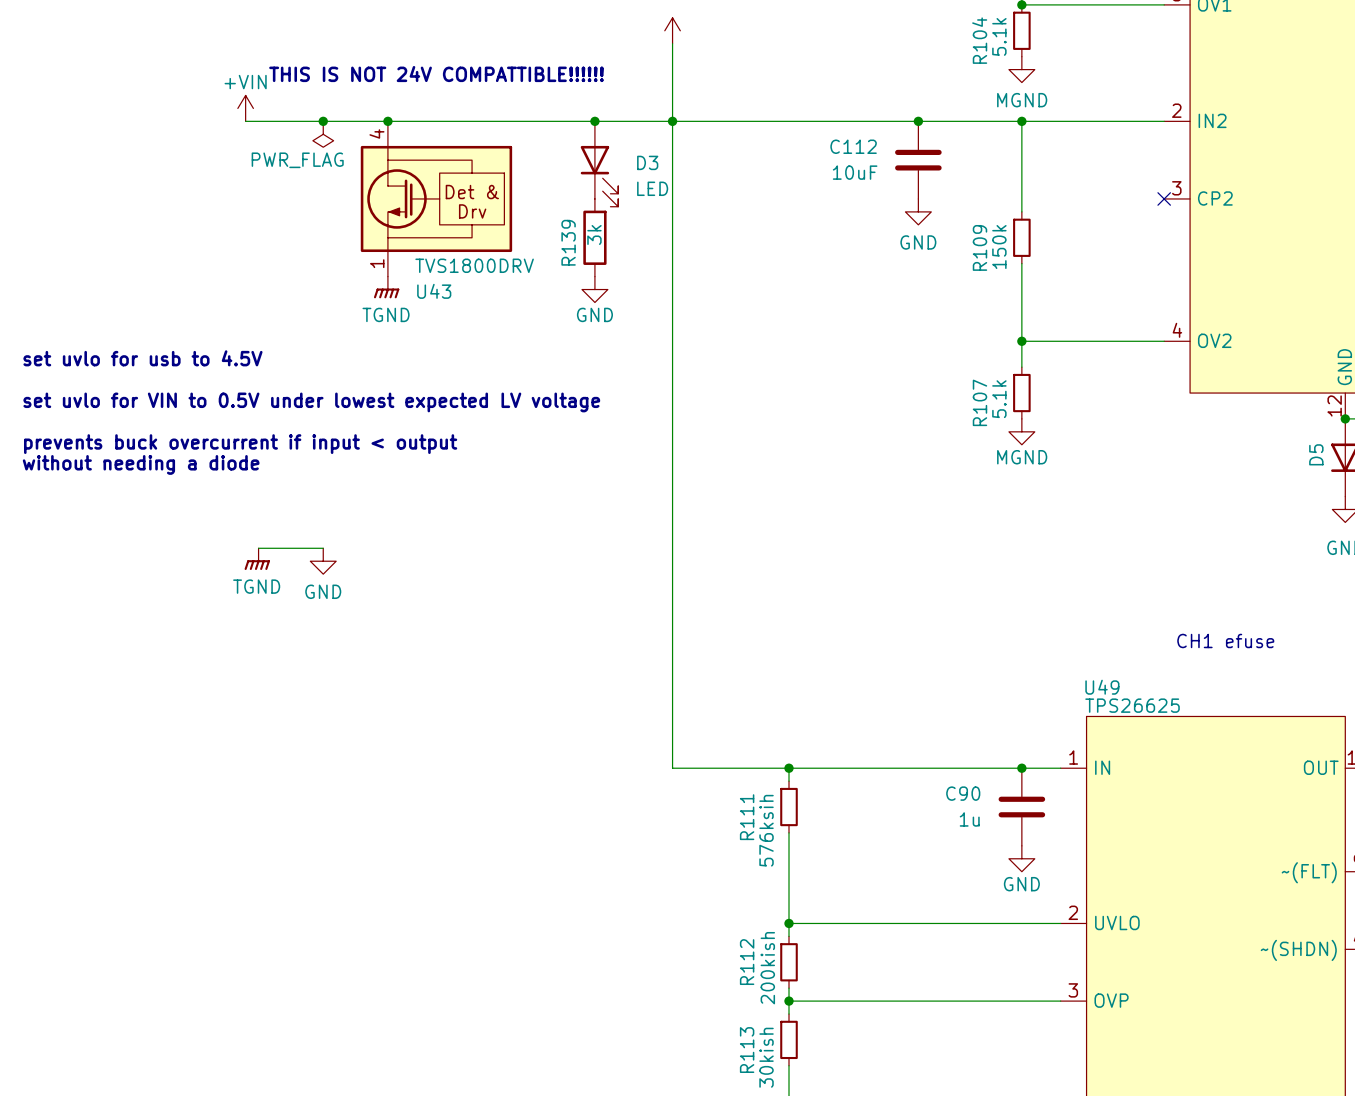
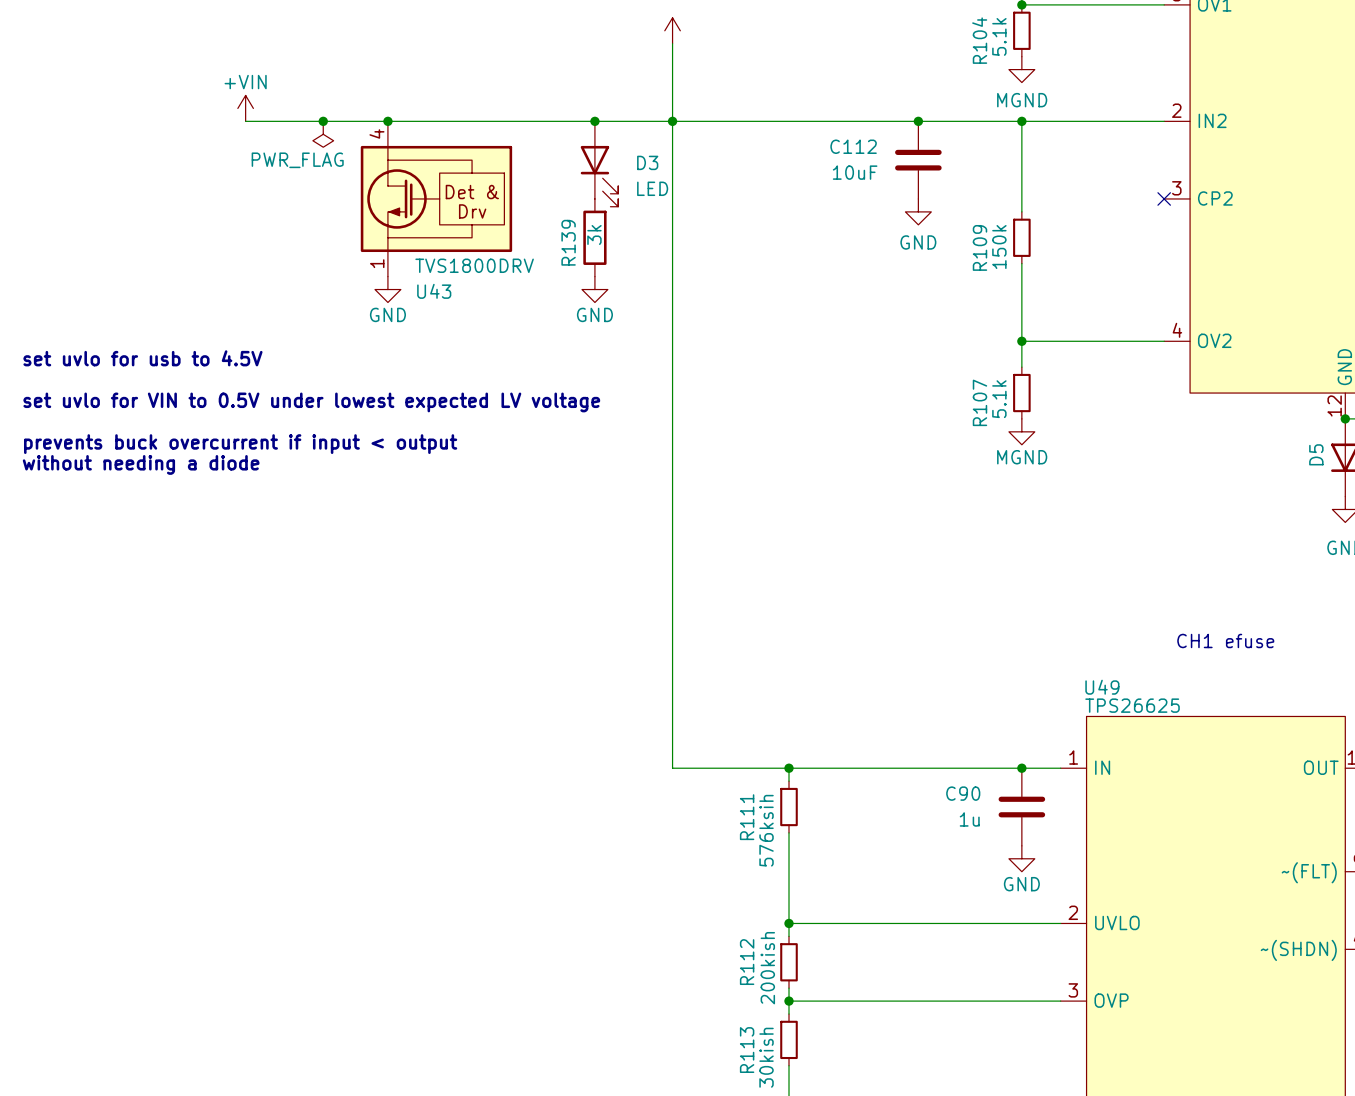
text: THIS IS NOT 24V COMPATTIBLE!!!!!! (436, 74) -> none
power symbol: TGND (386, 287) -> GND (387, 289)
wire: (258, 548) (323, 548) -> none
power symbol: TGND (257, 559) -> none
power symbol: GND (323, 561) -> none

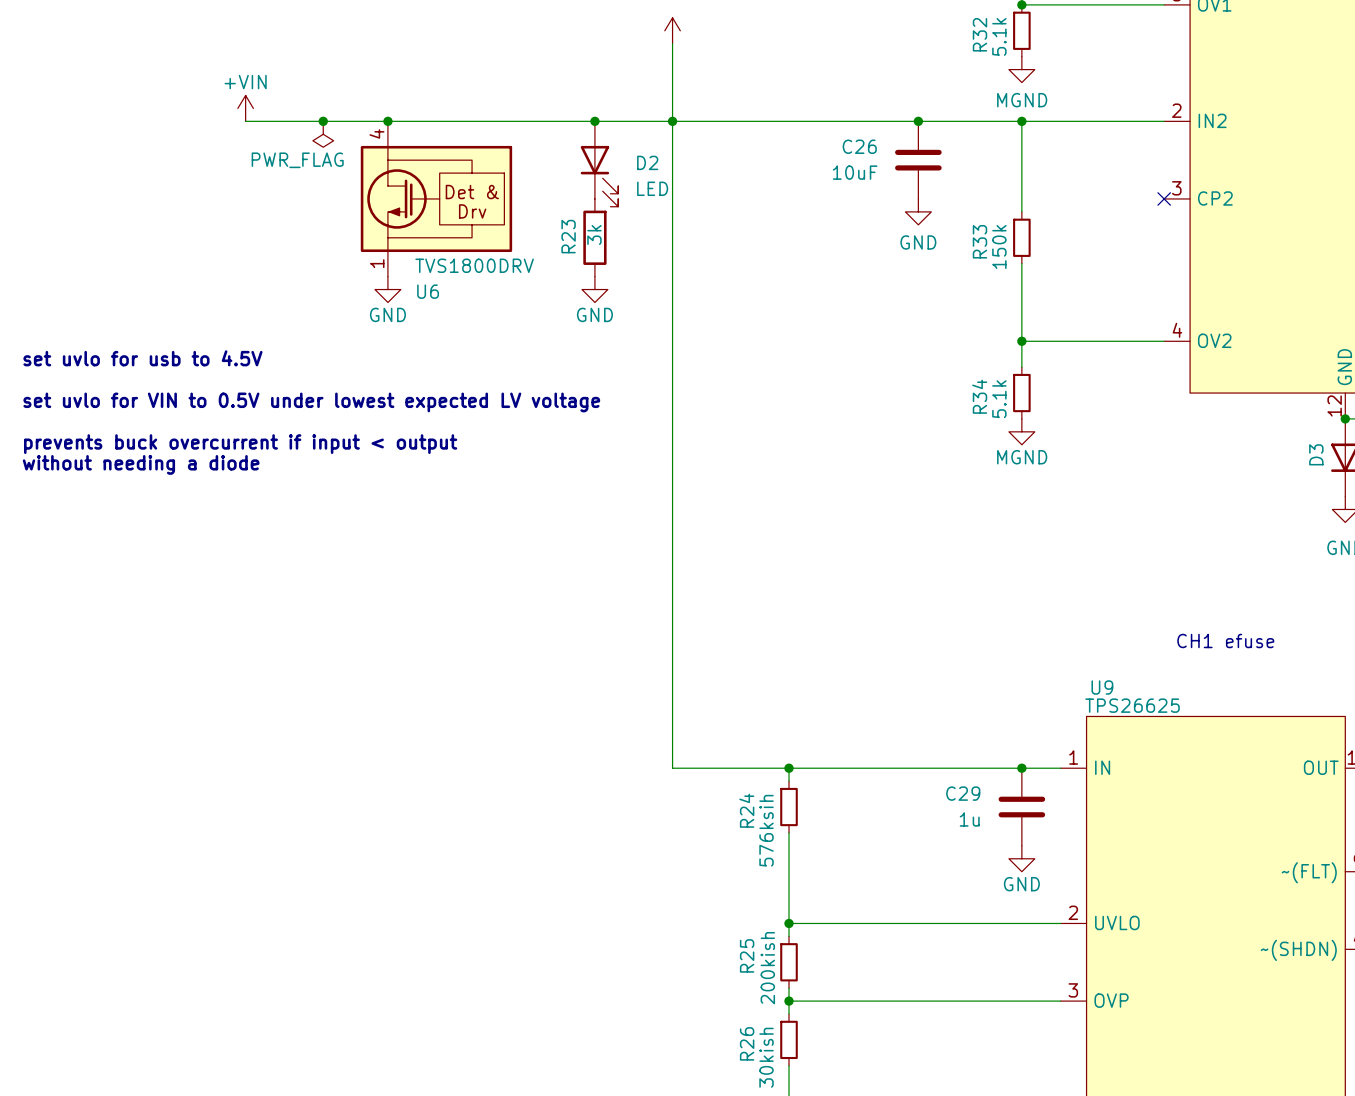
R104 name: R104 (979, 40) -> R32 (979, 34)
C112 name: C112 (853, 146) -> C26 (859, 146)
D3 name: D3 (647, 162) -> D2 (647, 162)
R139 name: R139 (568, 242) -> R23 (568, 236)
R109 name: R109 (979, 247) -> R33 (979, 241)
U43 name: U43 (434, 291) -> U6 (428, 291)
R107 name: R107 (979, 402) -> R34 (979, 396)
D5 name: D5 (1316, 454) -> D3 (1316, 454)
U49 name: U49 (1102, 687) -> U9 (1102, 687)
C90 name: C90 (963, 793) -> C29 (963, 793)
R111 name: R111 (747, 817) -> R24 (746, 810)
R112 name: R112 (747, 962) -> R25 (747, 955)
R113 name: R113 (747, 1050) -> R26 (747, 1043)

